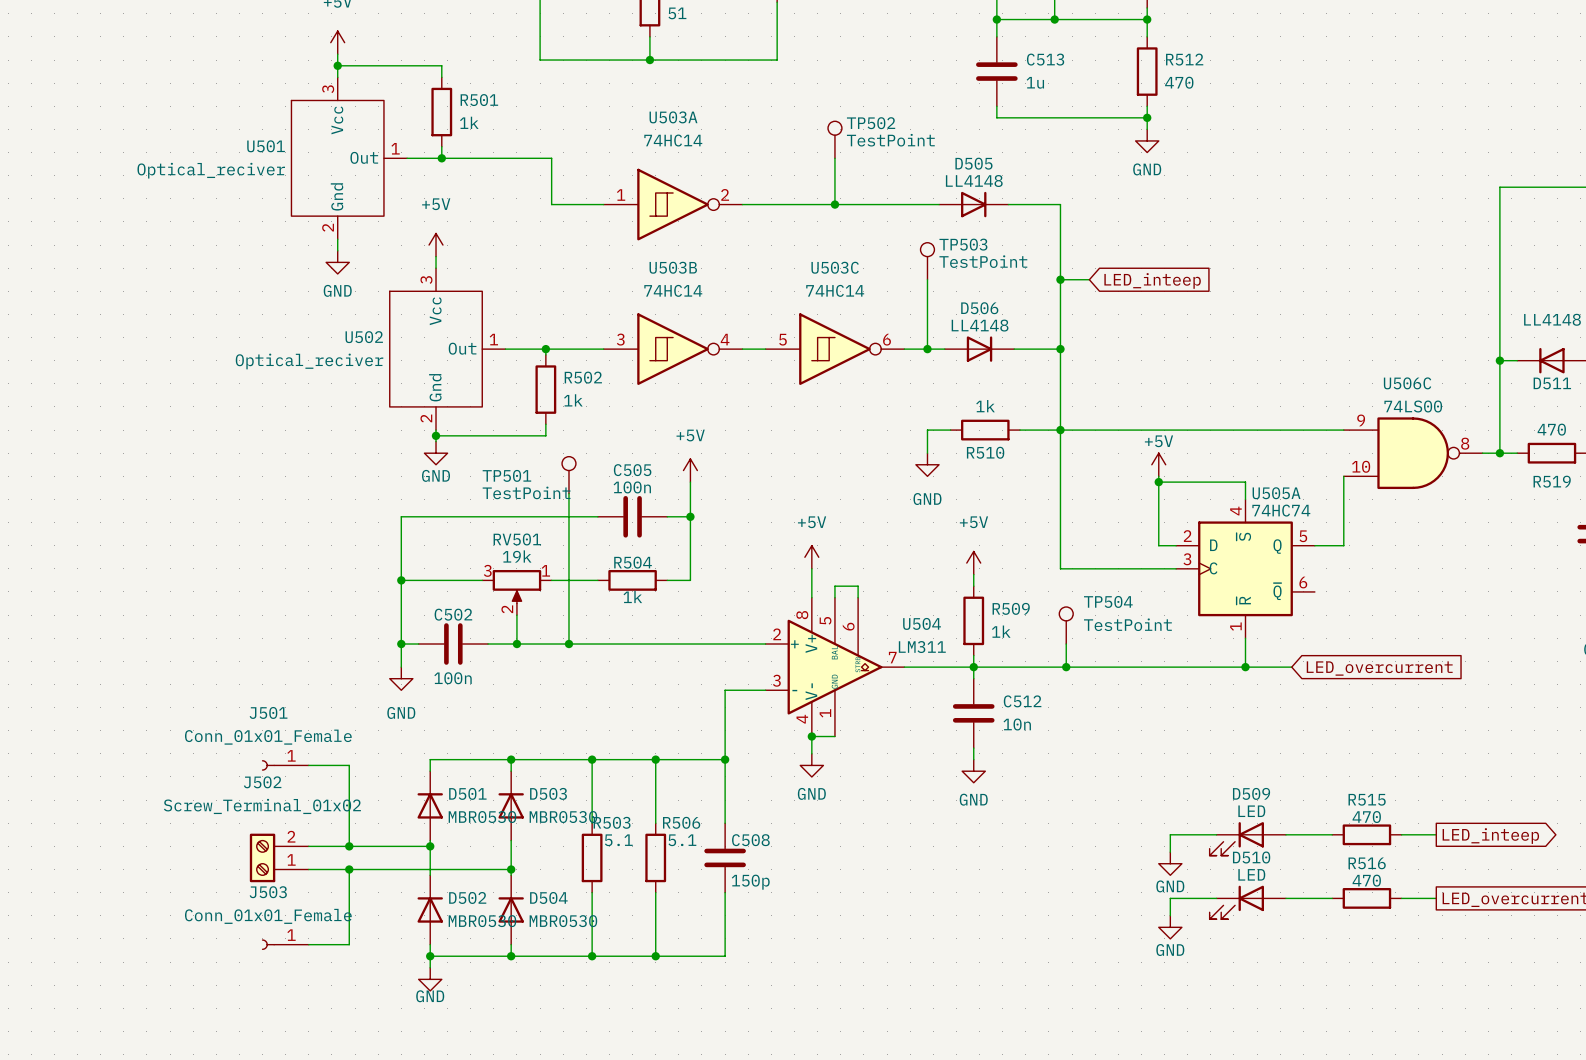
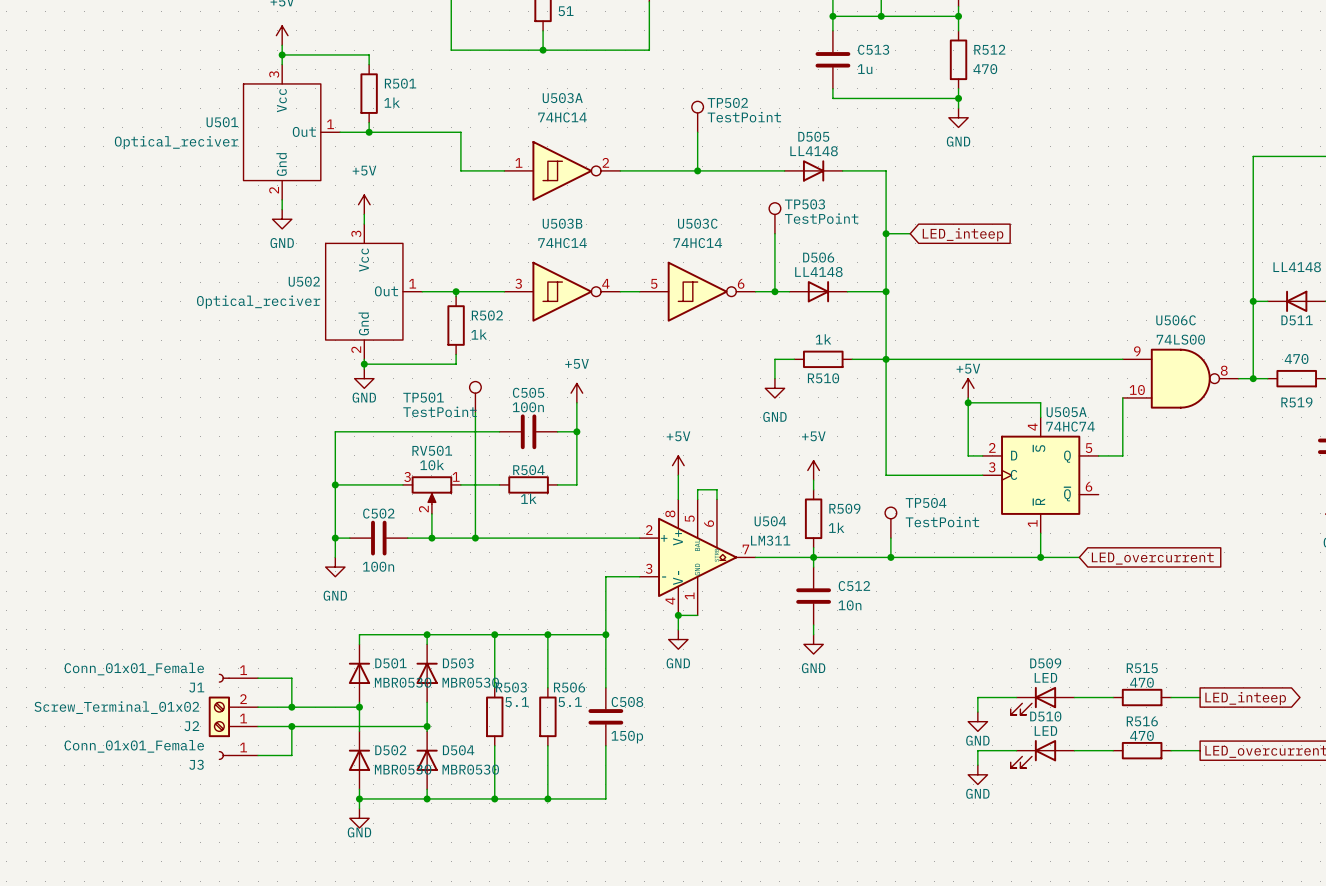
RV501 value: 19k (517, 556) -> 10k (432, 465)
J501: Conn_01x01_Female (285, 765) -> none
wire: (308, 765) (349, 765) (349, 811) -> (258, 678) (291, 678)
J502 name: J502 (262, 782) -> J2 (191, 726)
J502 value position: Screw_Terminal_01x02 (262, 806) -> Screw_Terminal_01x02 (116, 707)
J1: none -> Conn_01x01_Female (238, 678)
J3: none -> Conn_01x01_Female (238, 755)
wire: (349, 904) (349, 944) (308, 944) -> (291, 755) (258, 755)
J503: Conn_01x01_Female (285, 944) -> none

